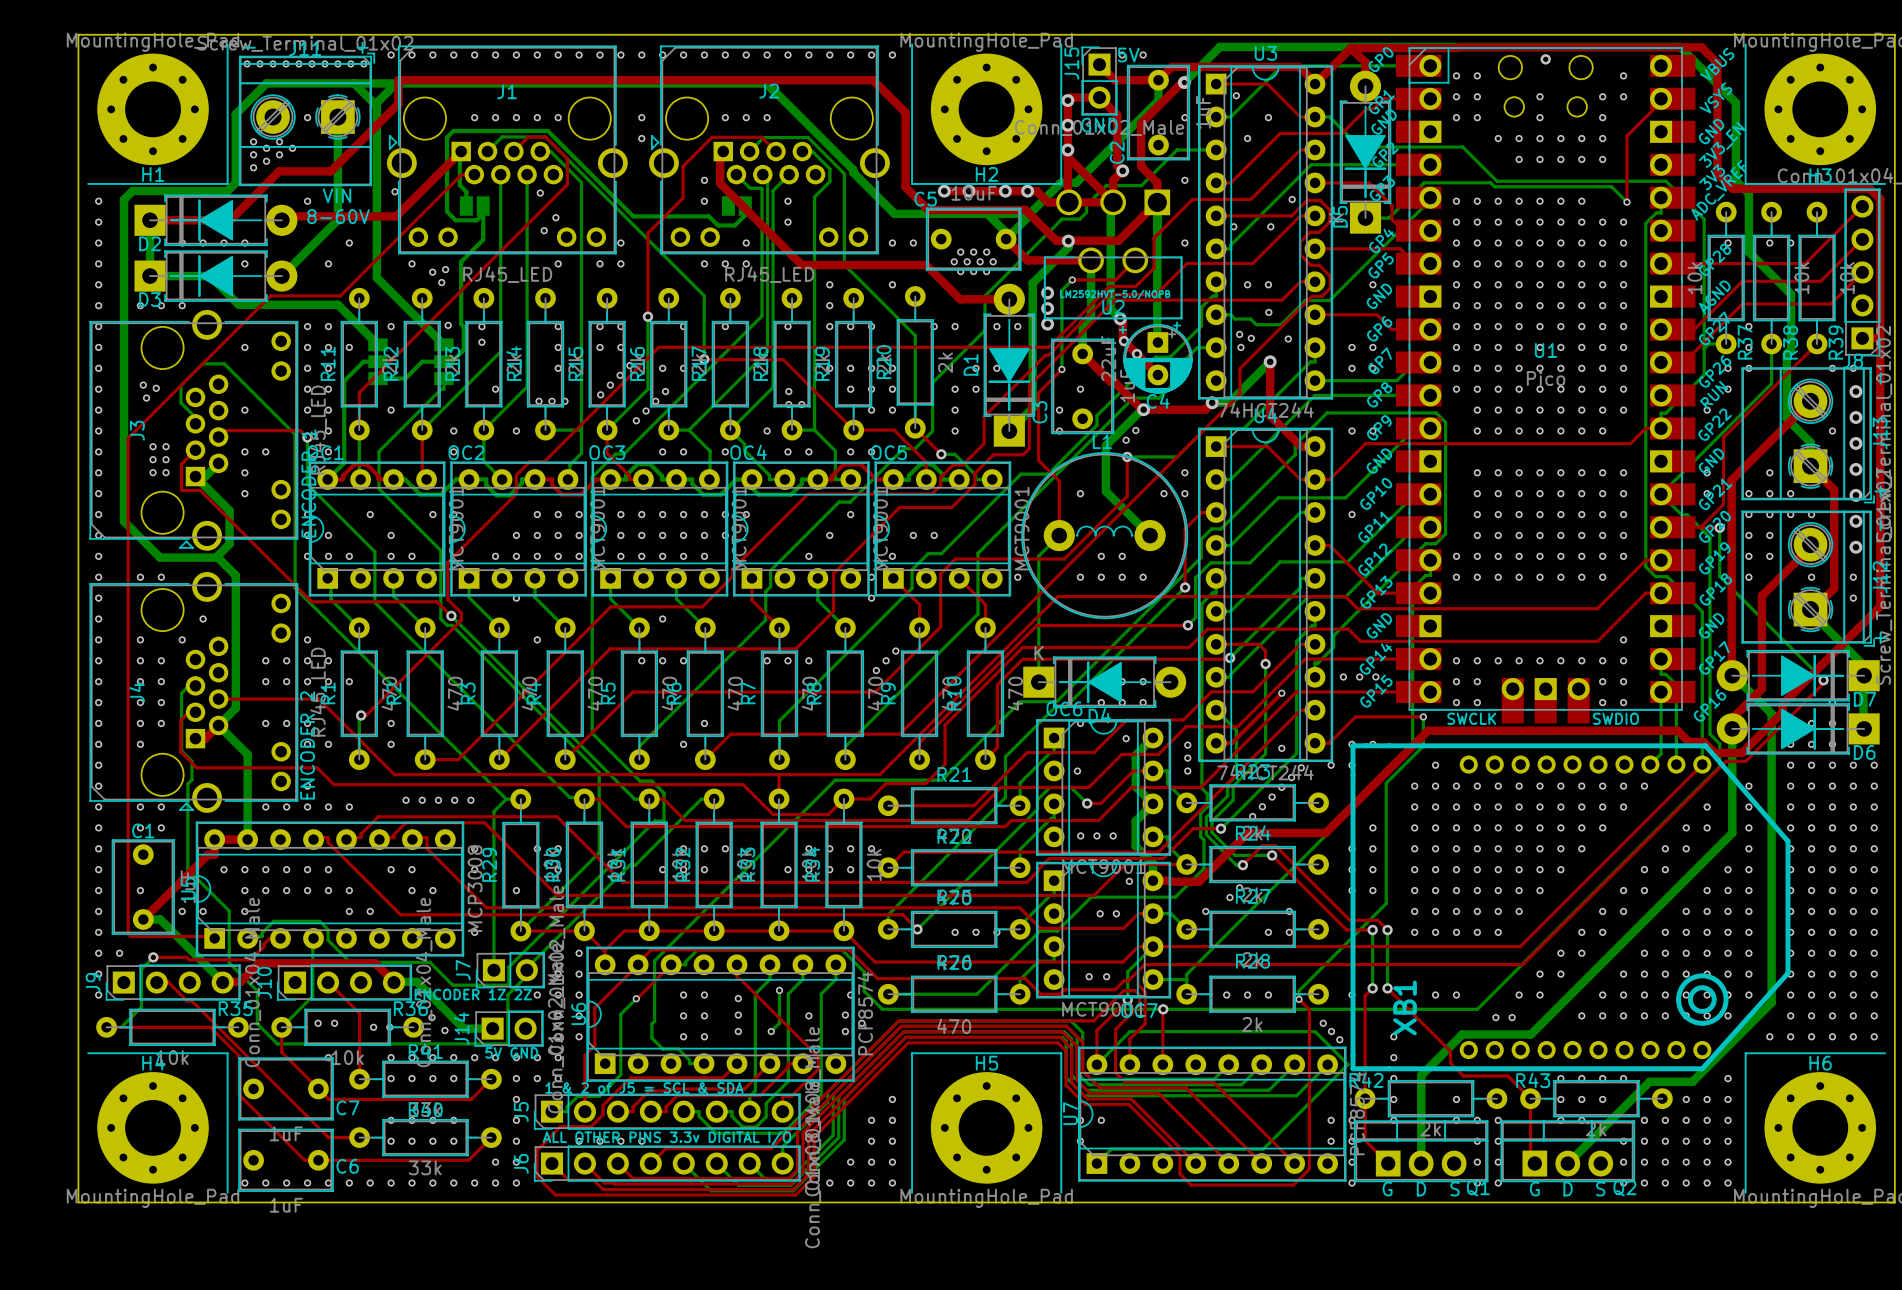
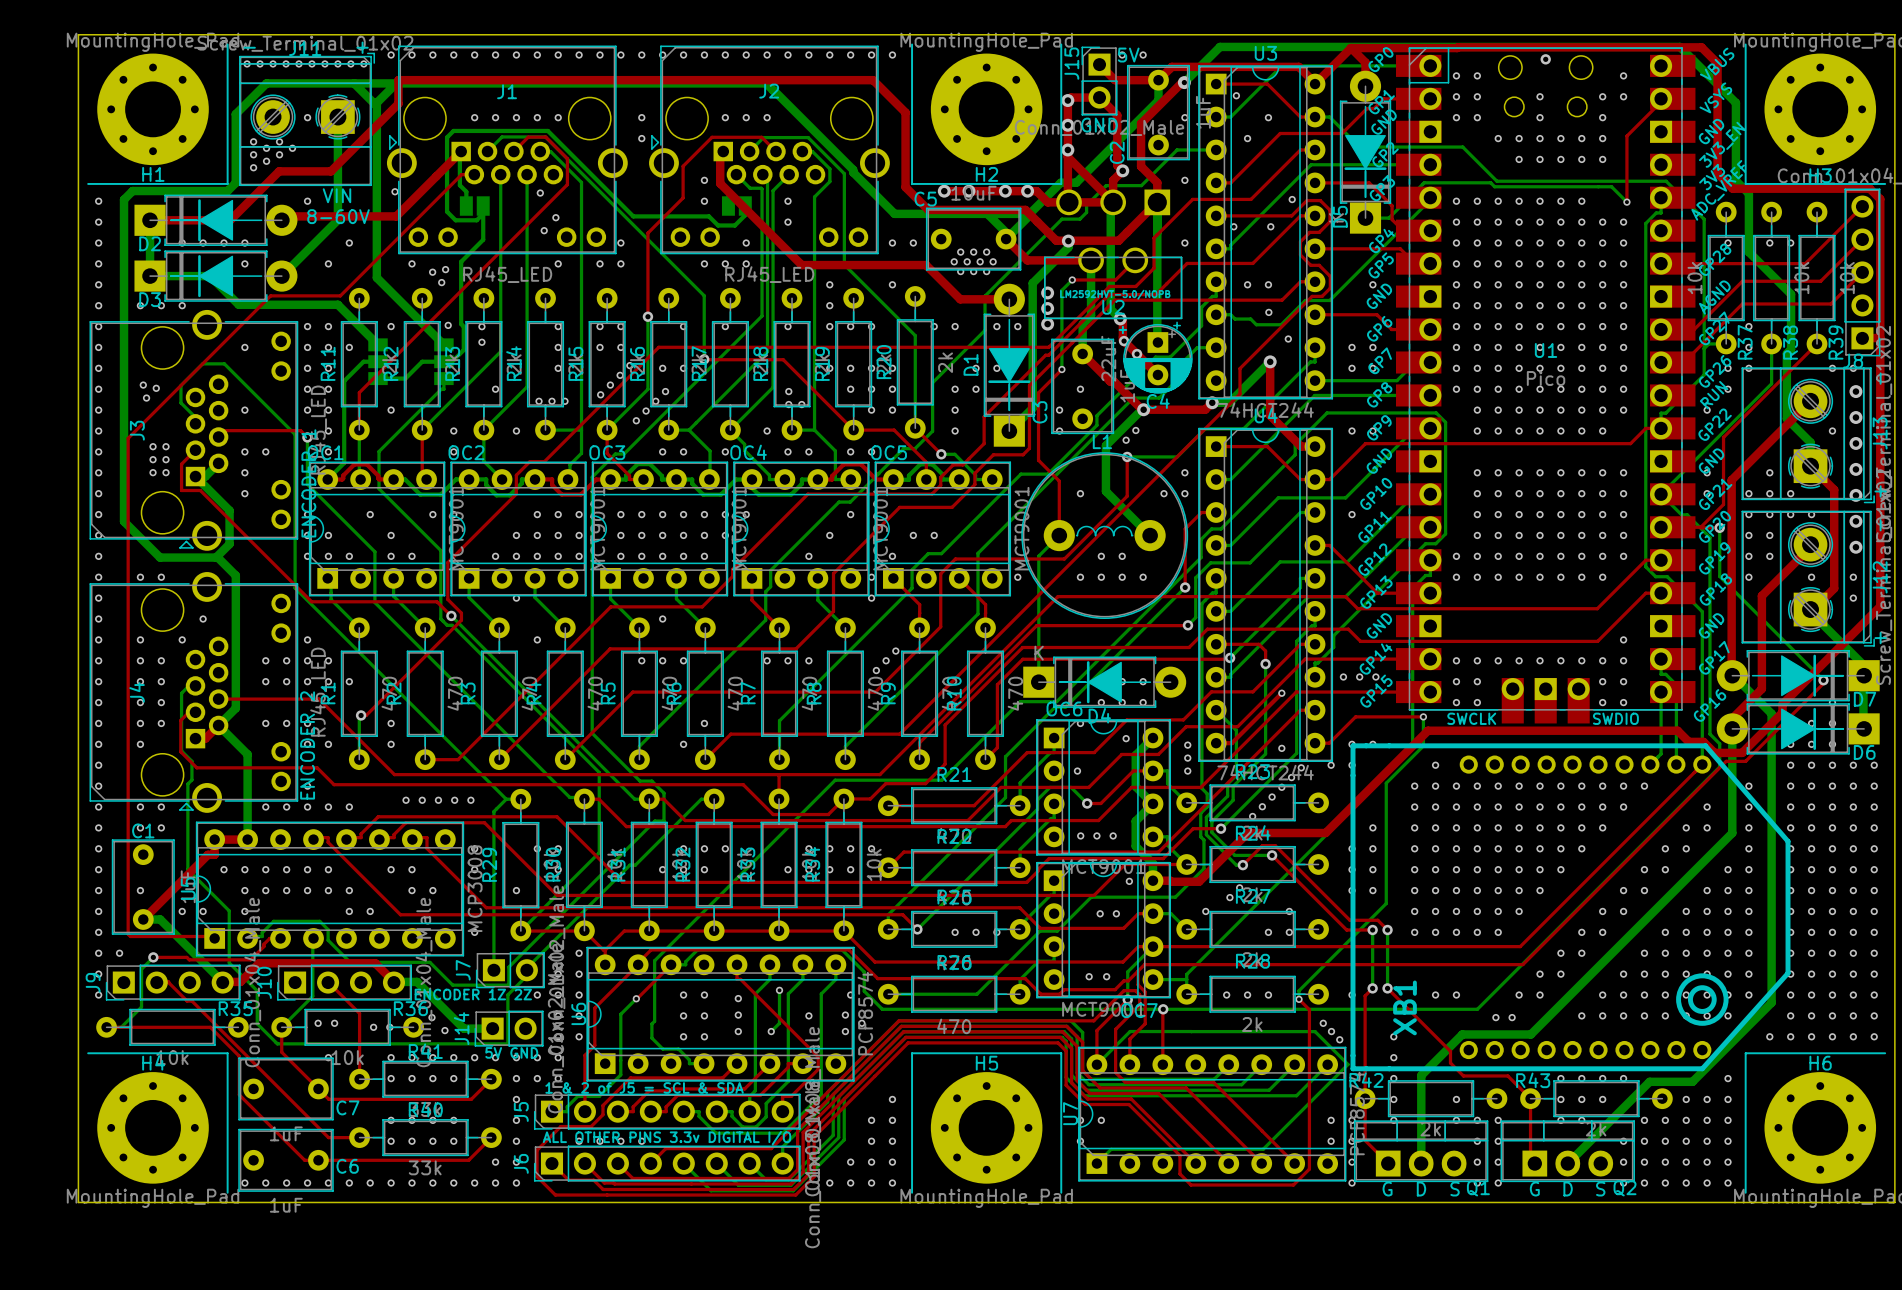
via: (1239, 334) -> none
via: (1251, 338) -> none
via: (1240, 347) -> none

